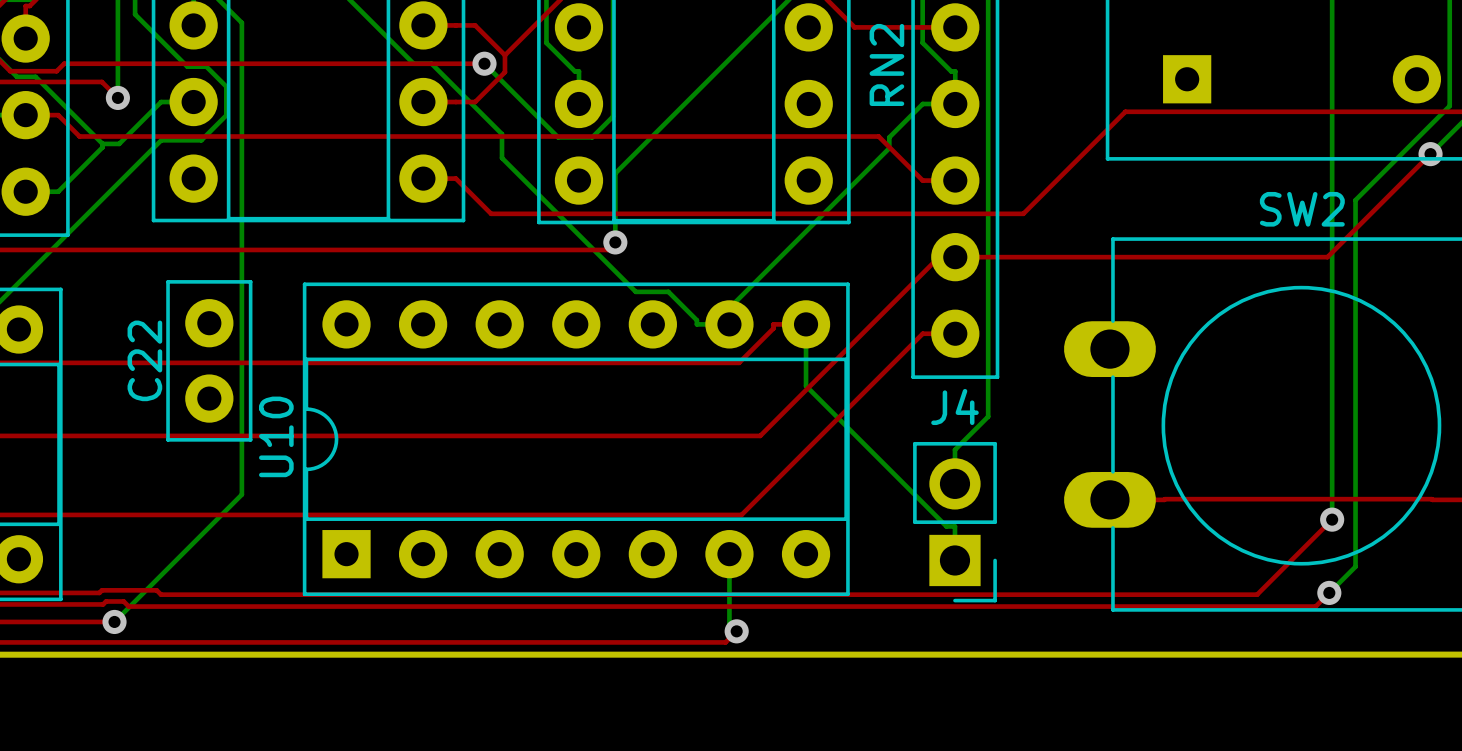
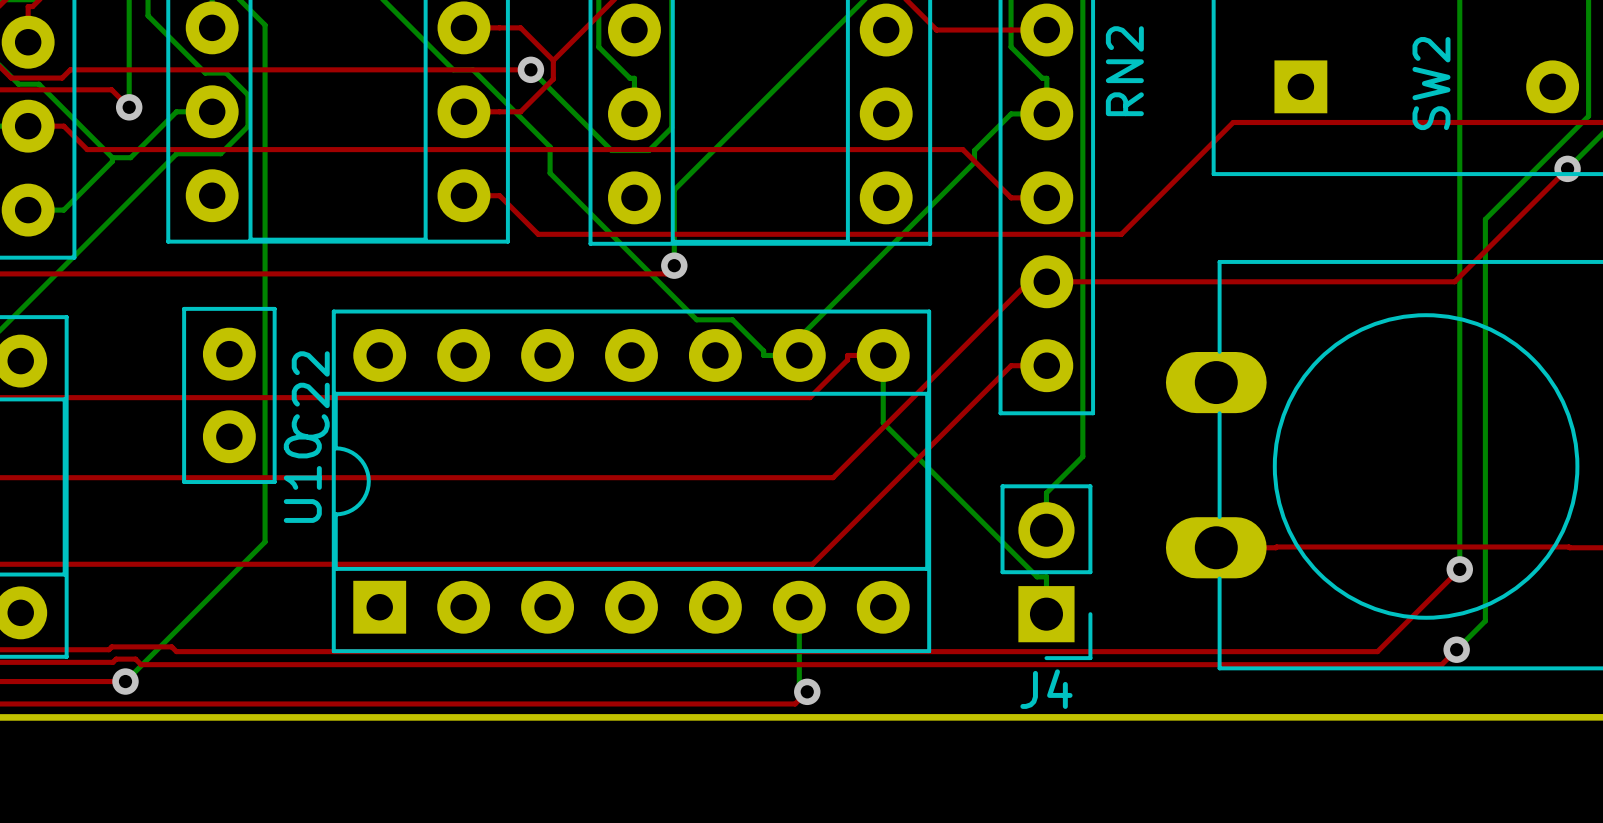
RN2 name position: RN2 (886, 64) -> RN2 (1124, 71)
SW2 name rotation: 0° (1302, 209) -> 90° counterclockwise (1431, 83)
SW2 name position: SW2 (1302, 209) -> SW2 (1431, 83)
C22 name position: C22 (144, 360) -> C22 (310, 395)
J4 name position: J4 (954, 406) -> J4 (1046, 689)

